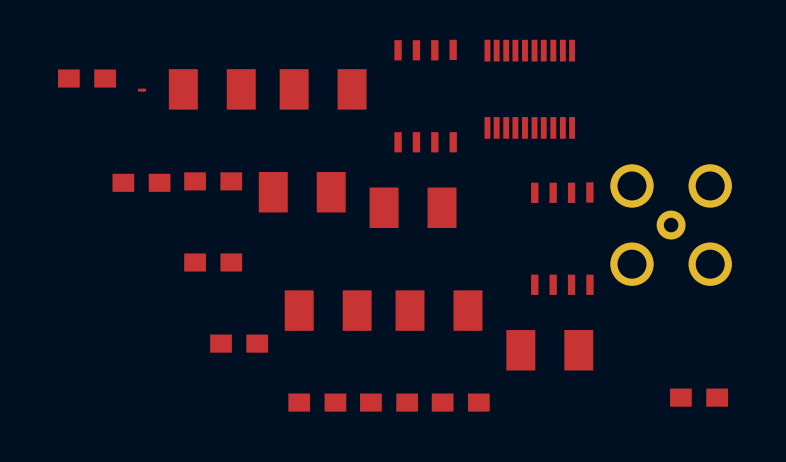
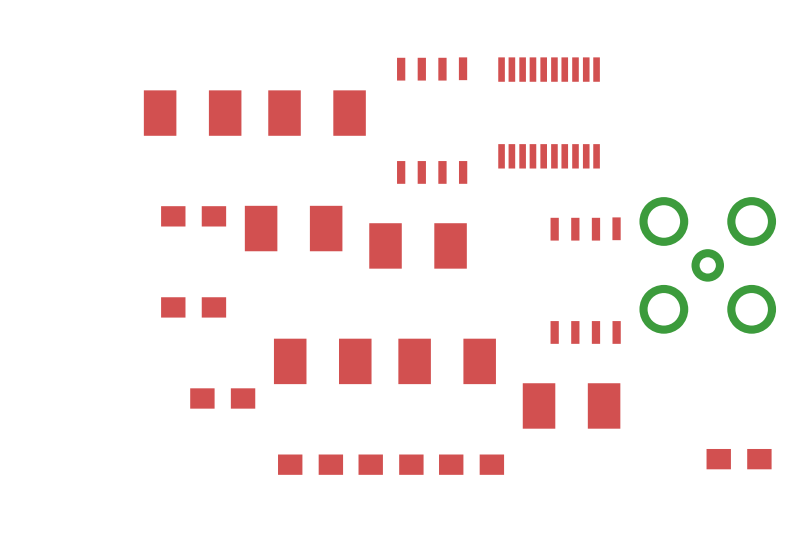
part: (87, 78) -> none
part: (142, 90) -> none
part: (141, 182) -> none

